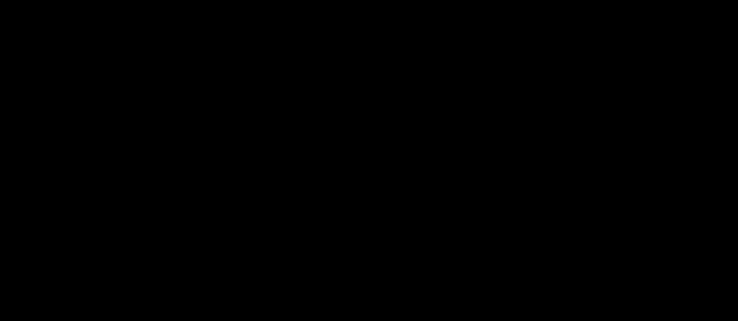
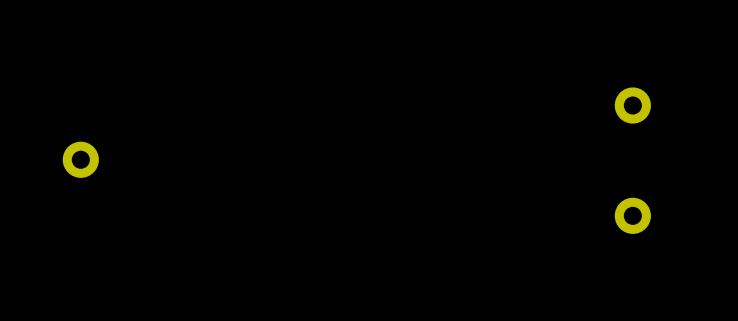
part: none -> (632, 105)
part: none -> (80, 159)
part: none -> (632, 215)

